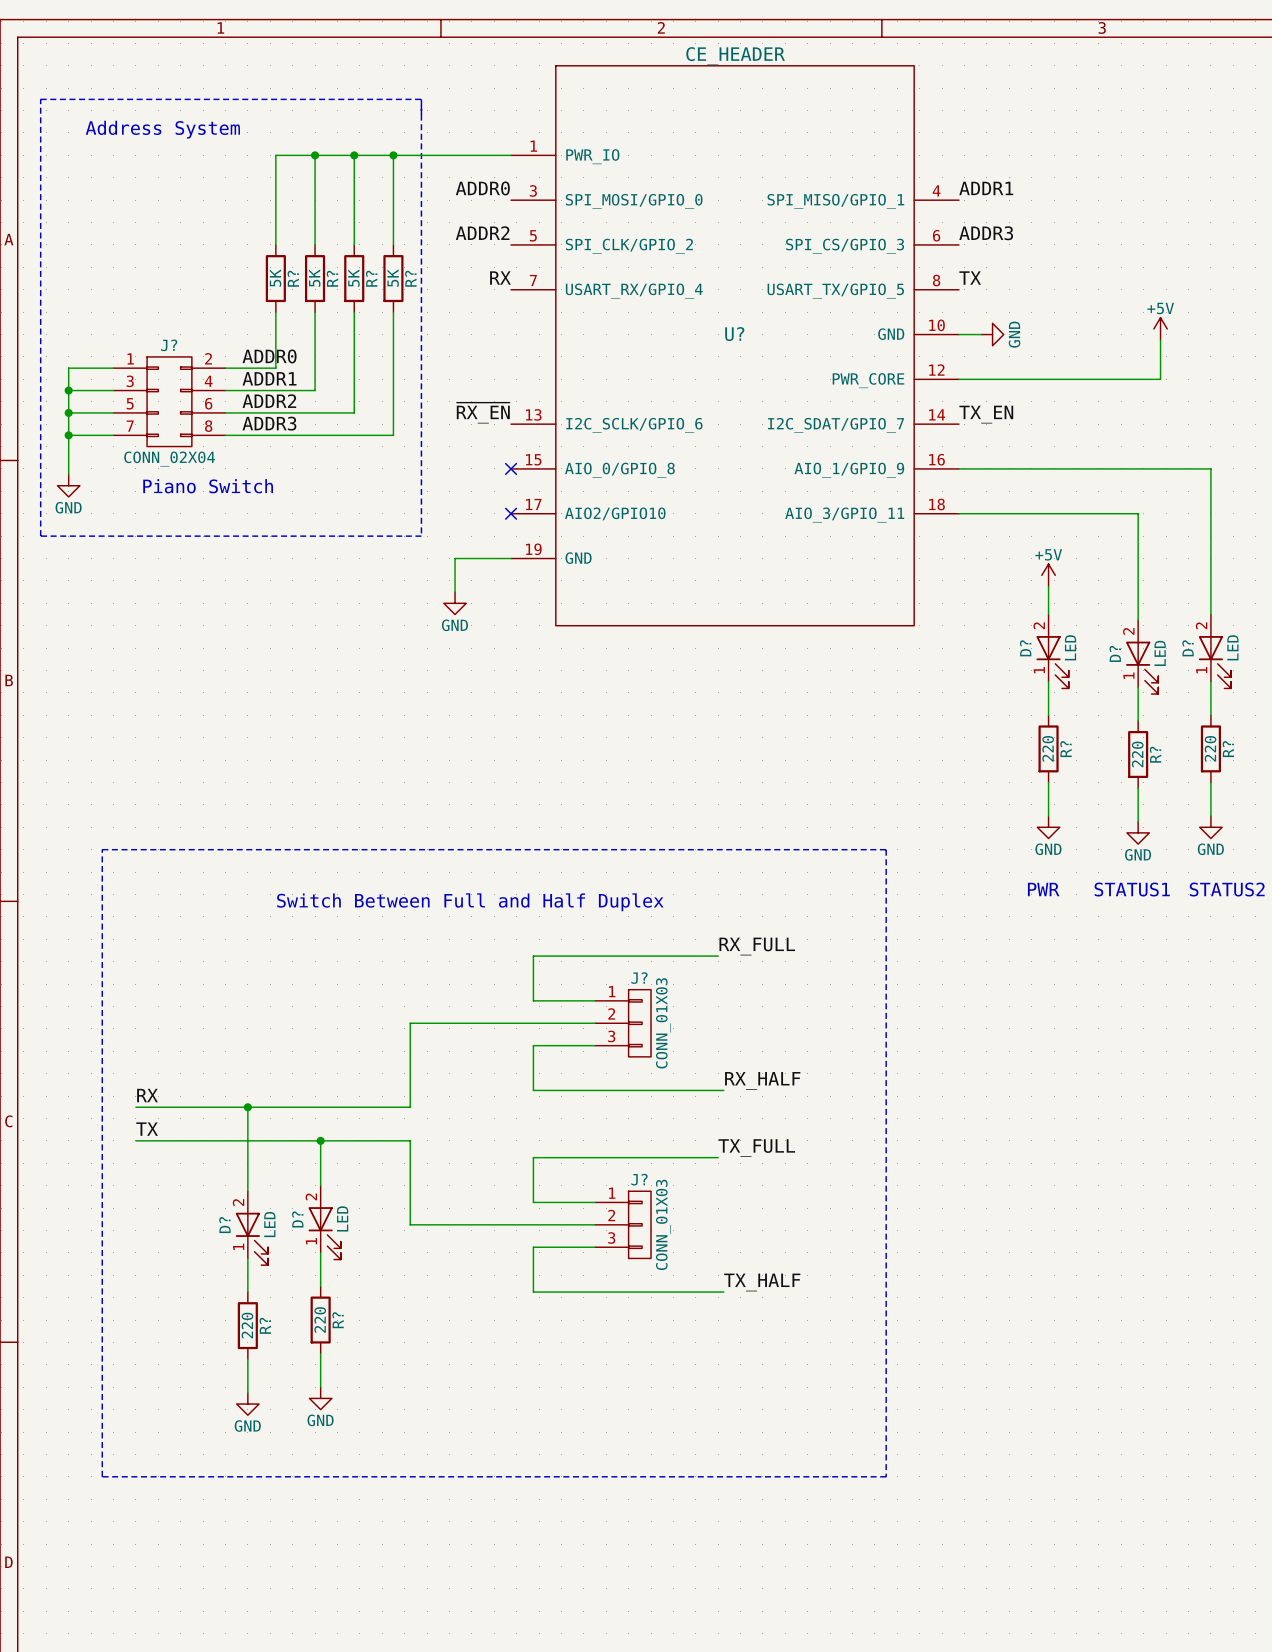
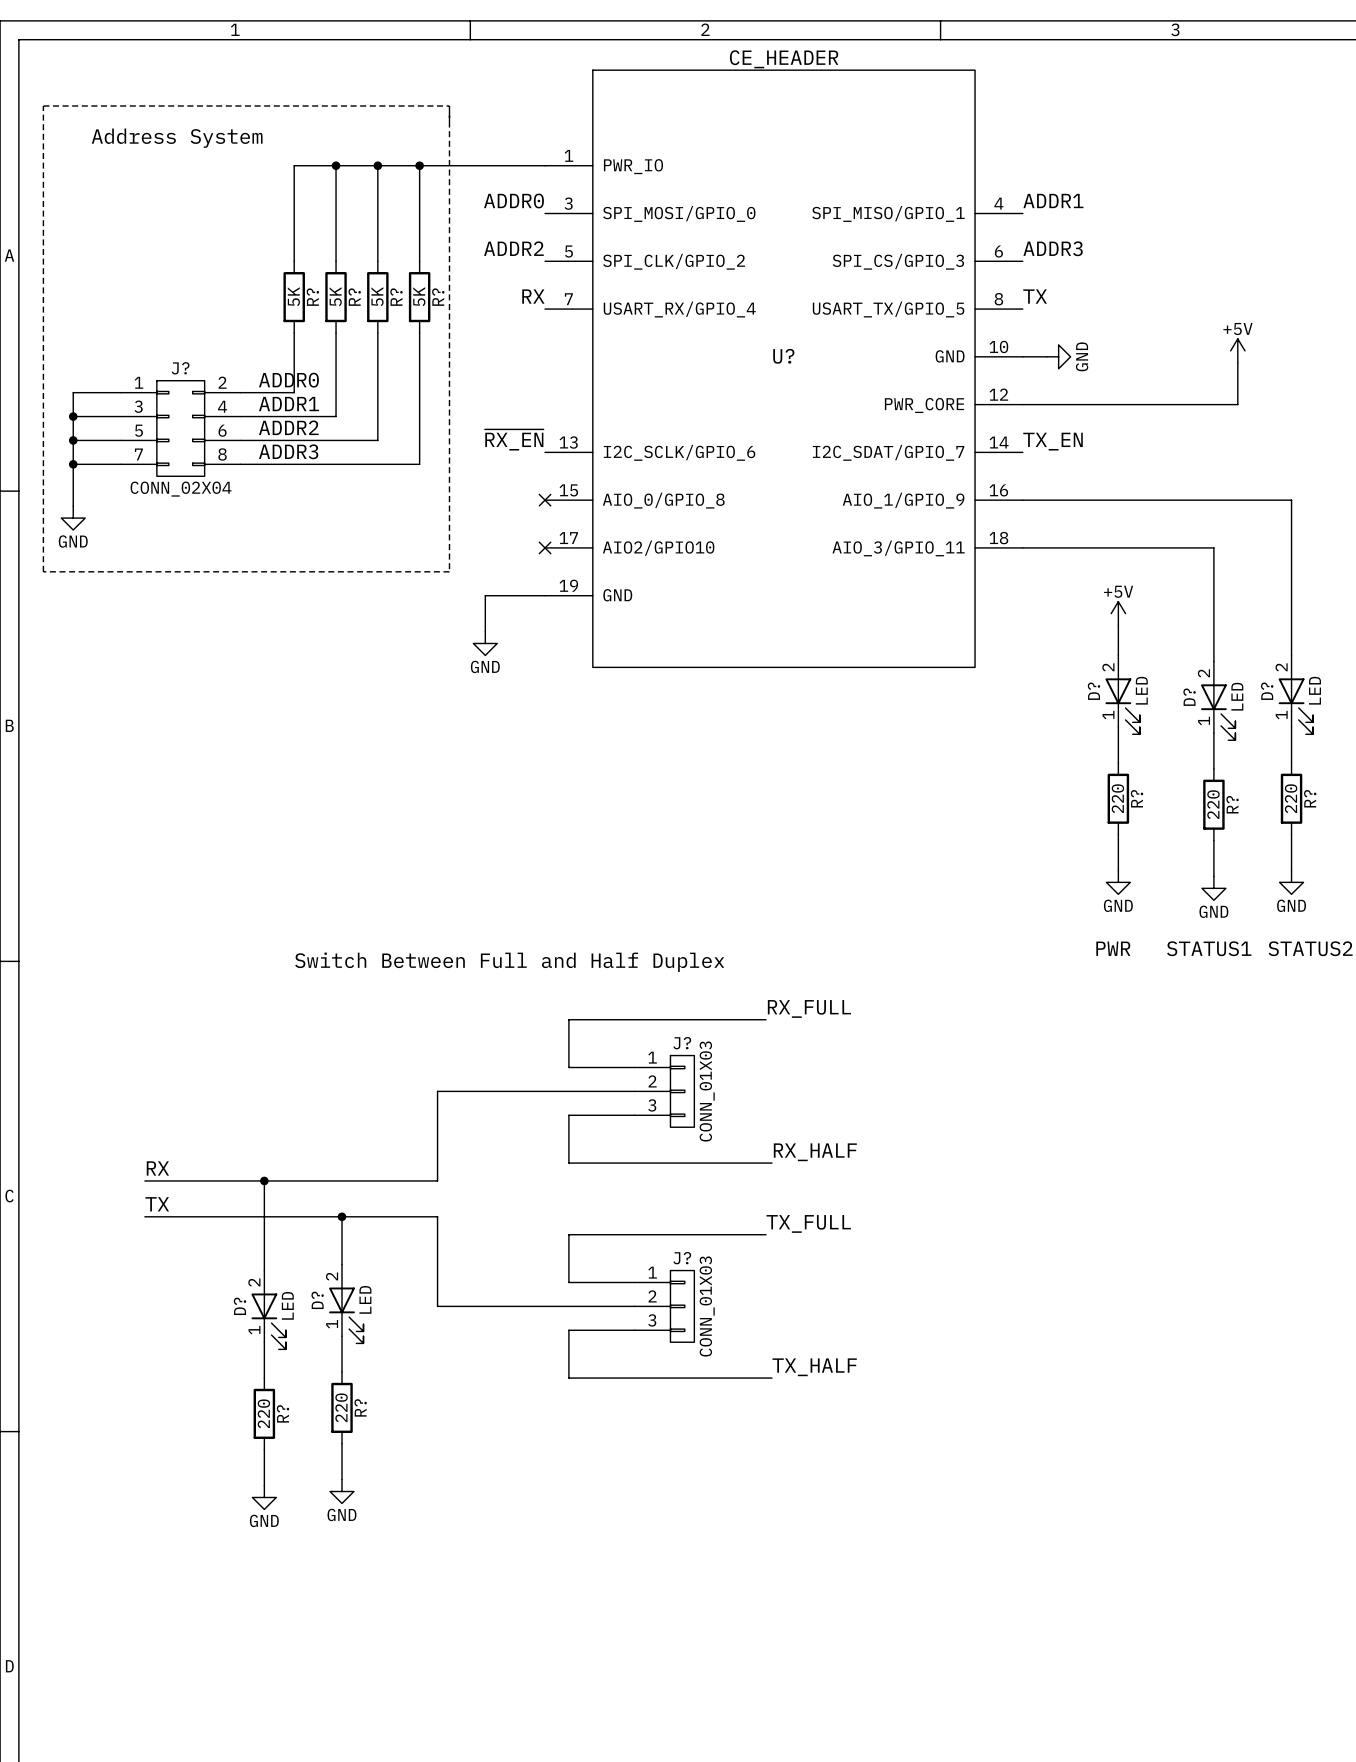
text: Piano Switch (208, 486) -> none
line: (102, 849) (886, 849) (886, 1476) (102, 1476) (102, 849) -> none

